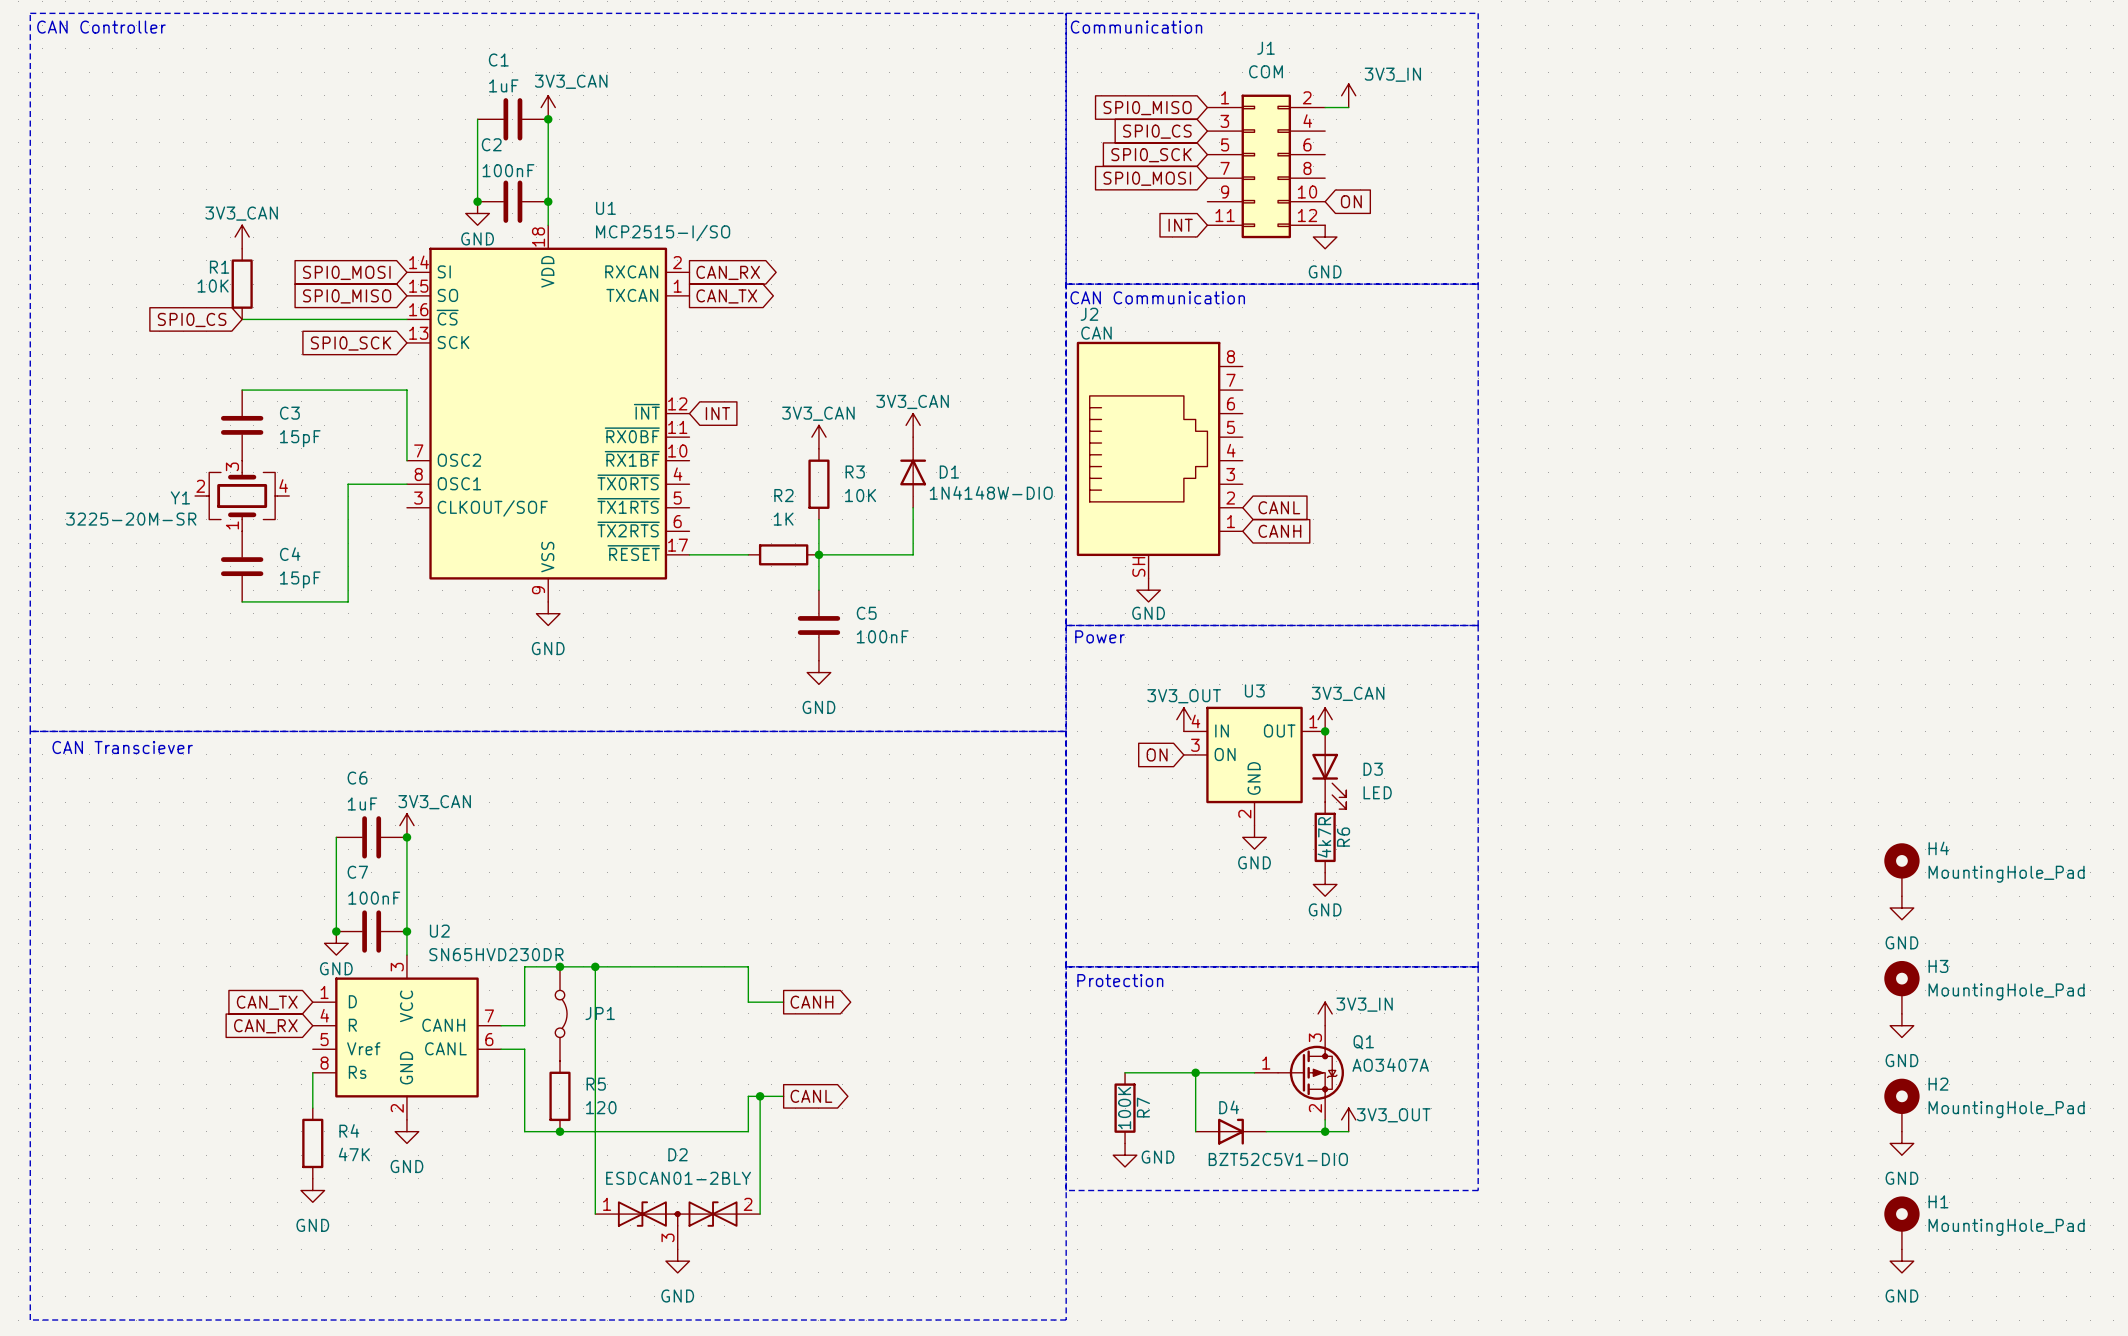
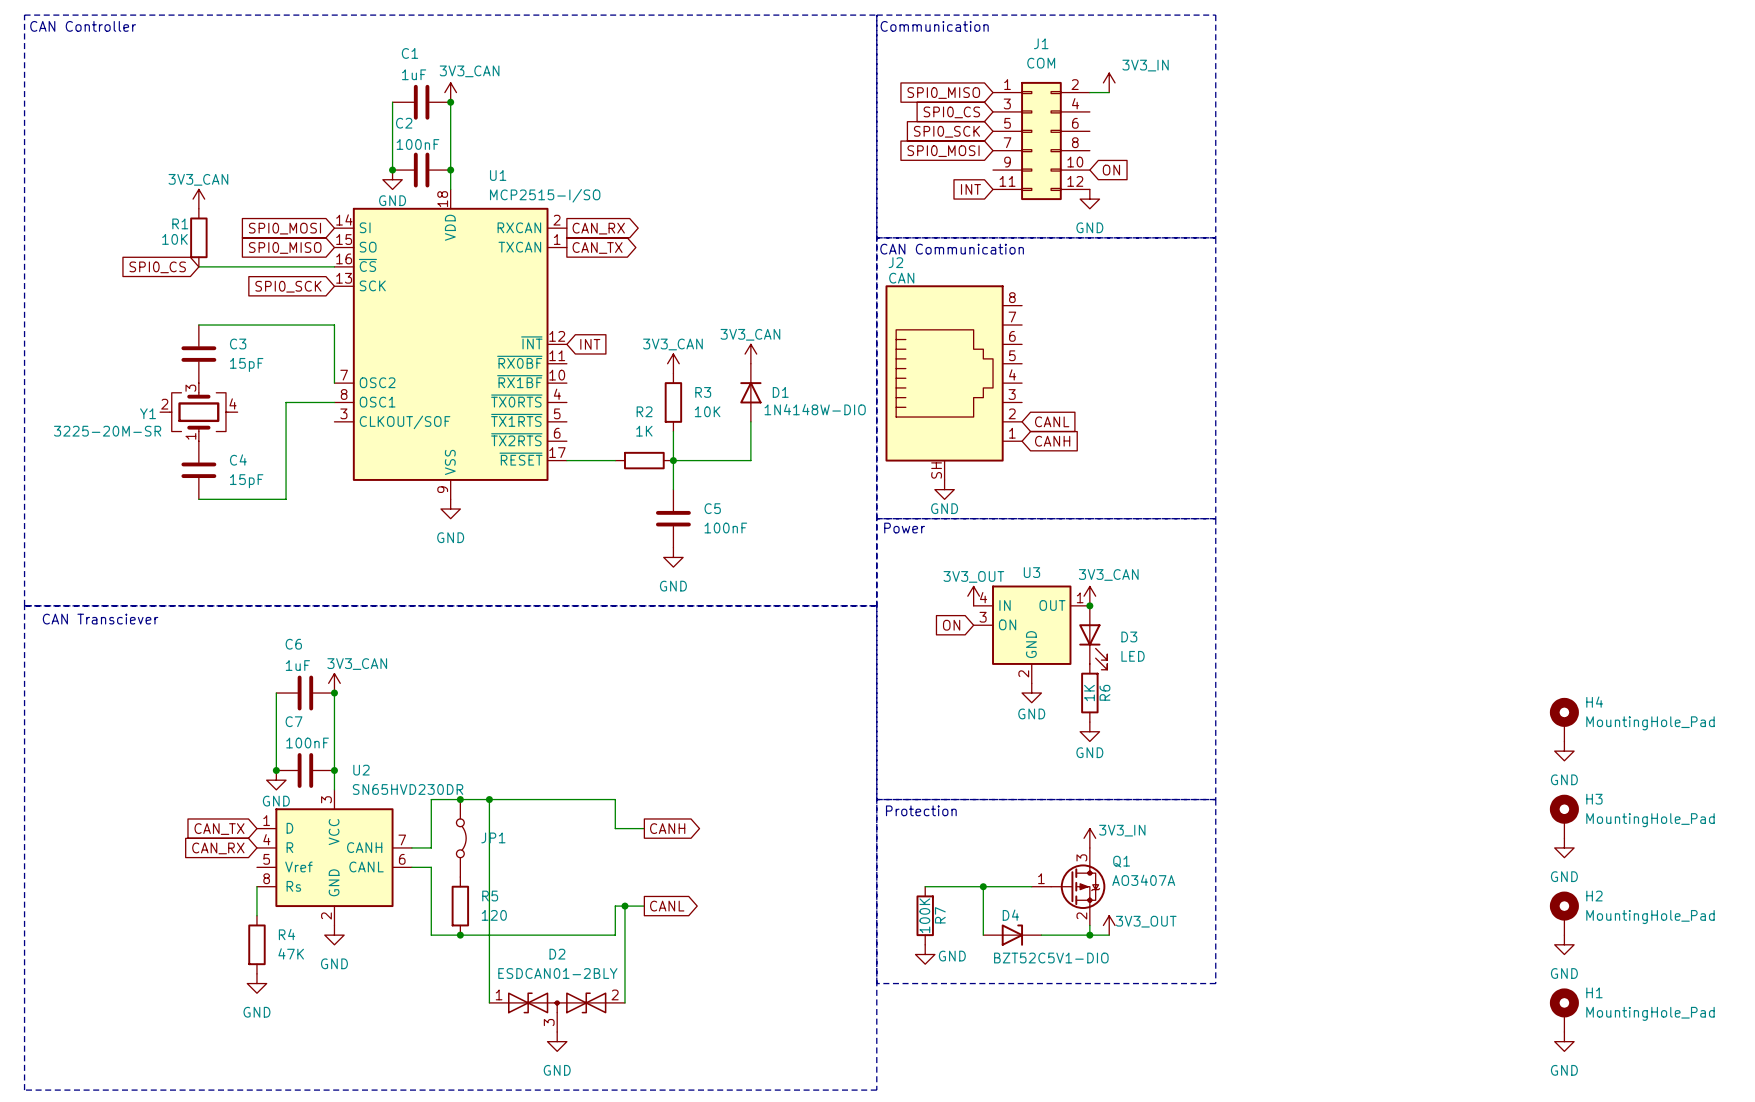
R6 value: 4k7R (1324, 837) -> 1K (1089, 693)

